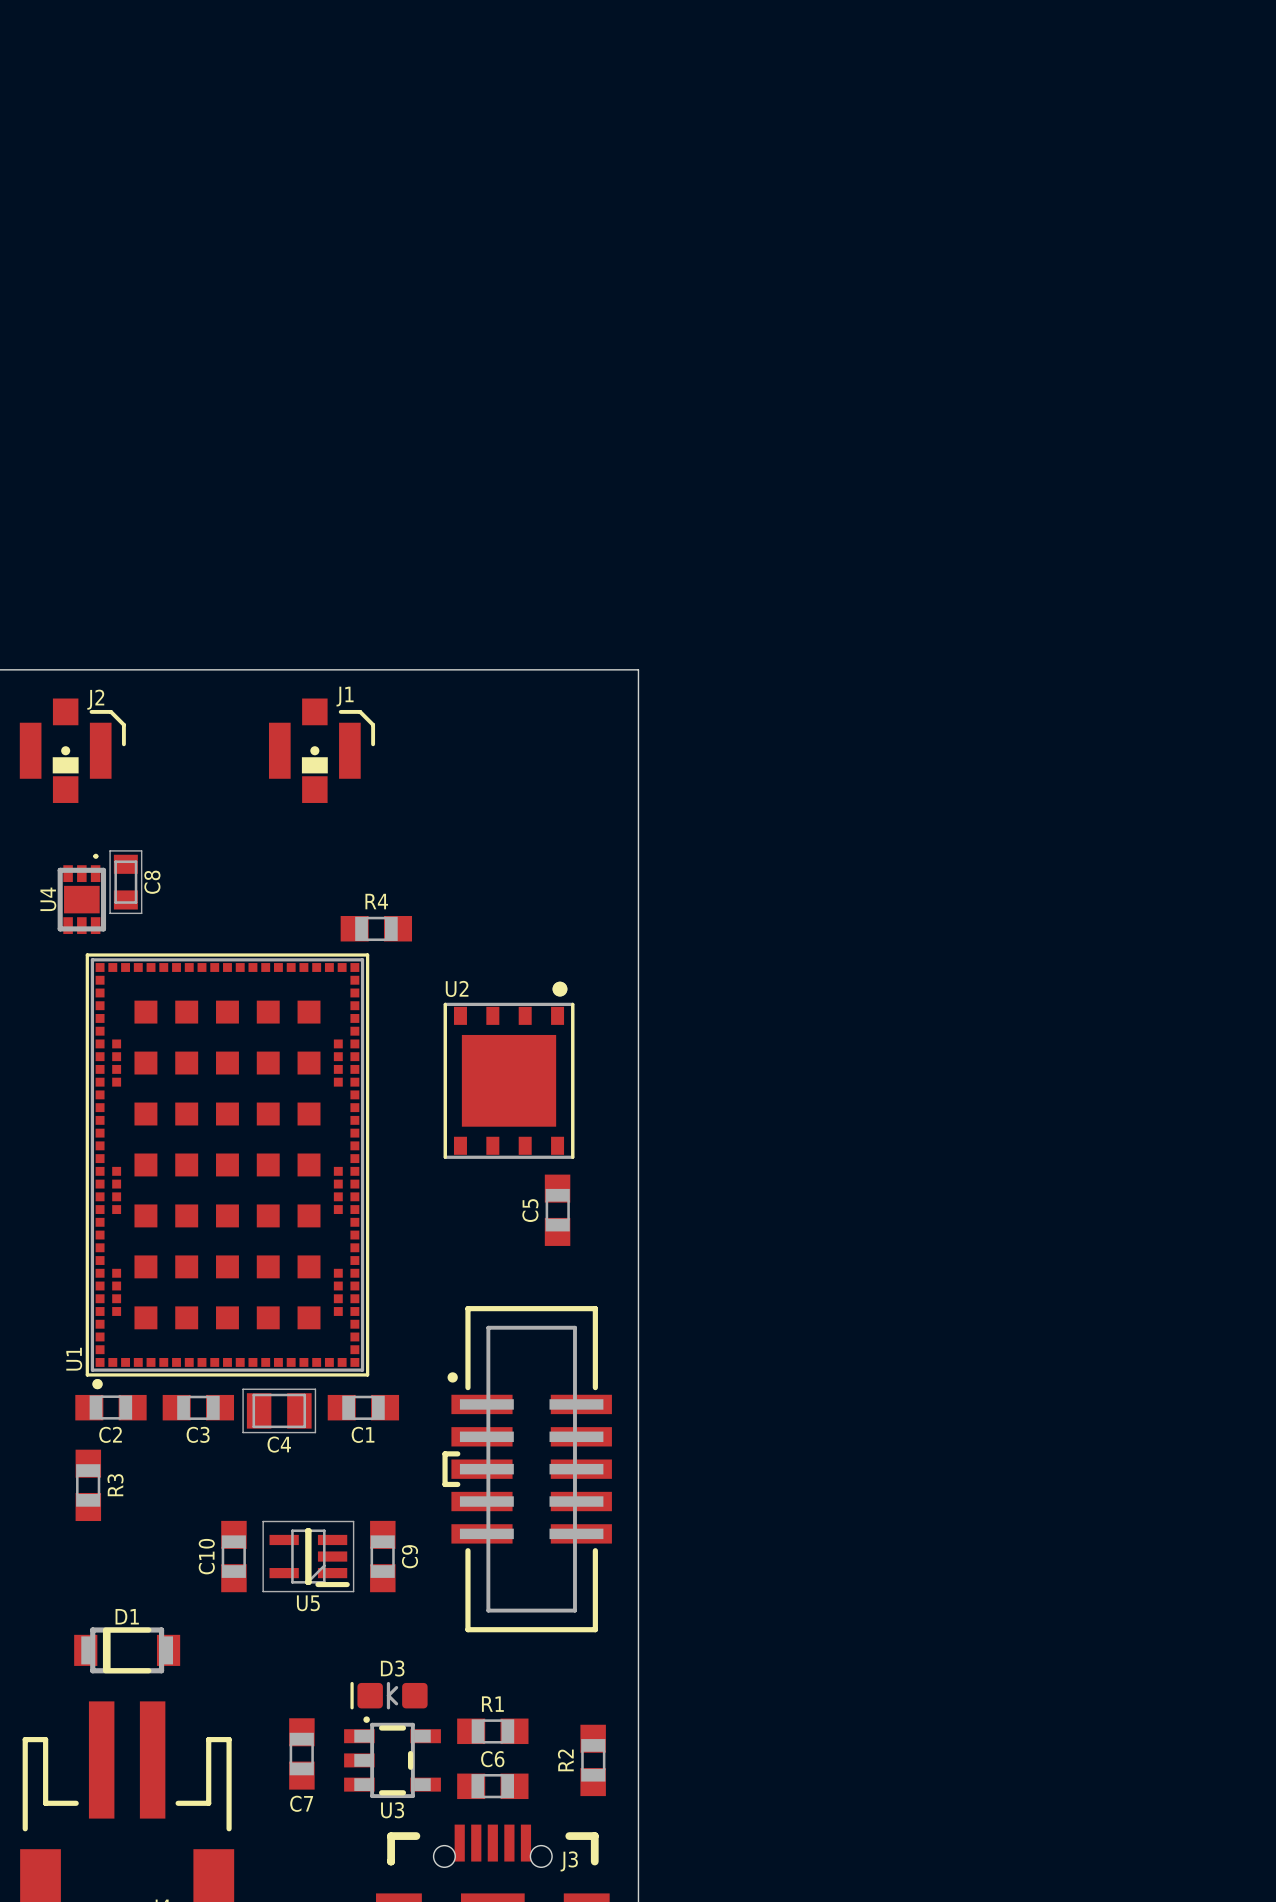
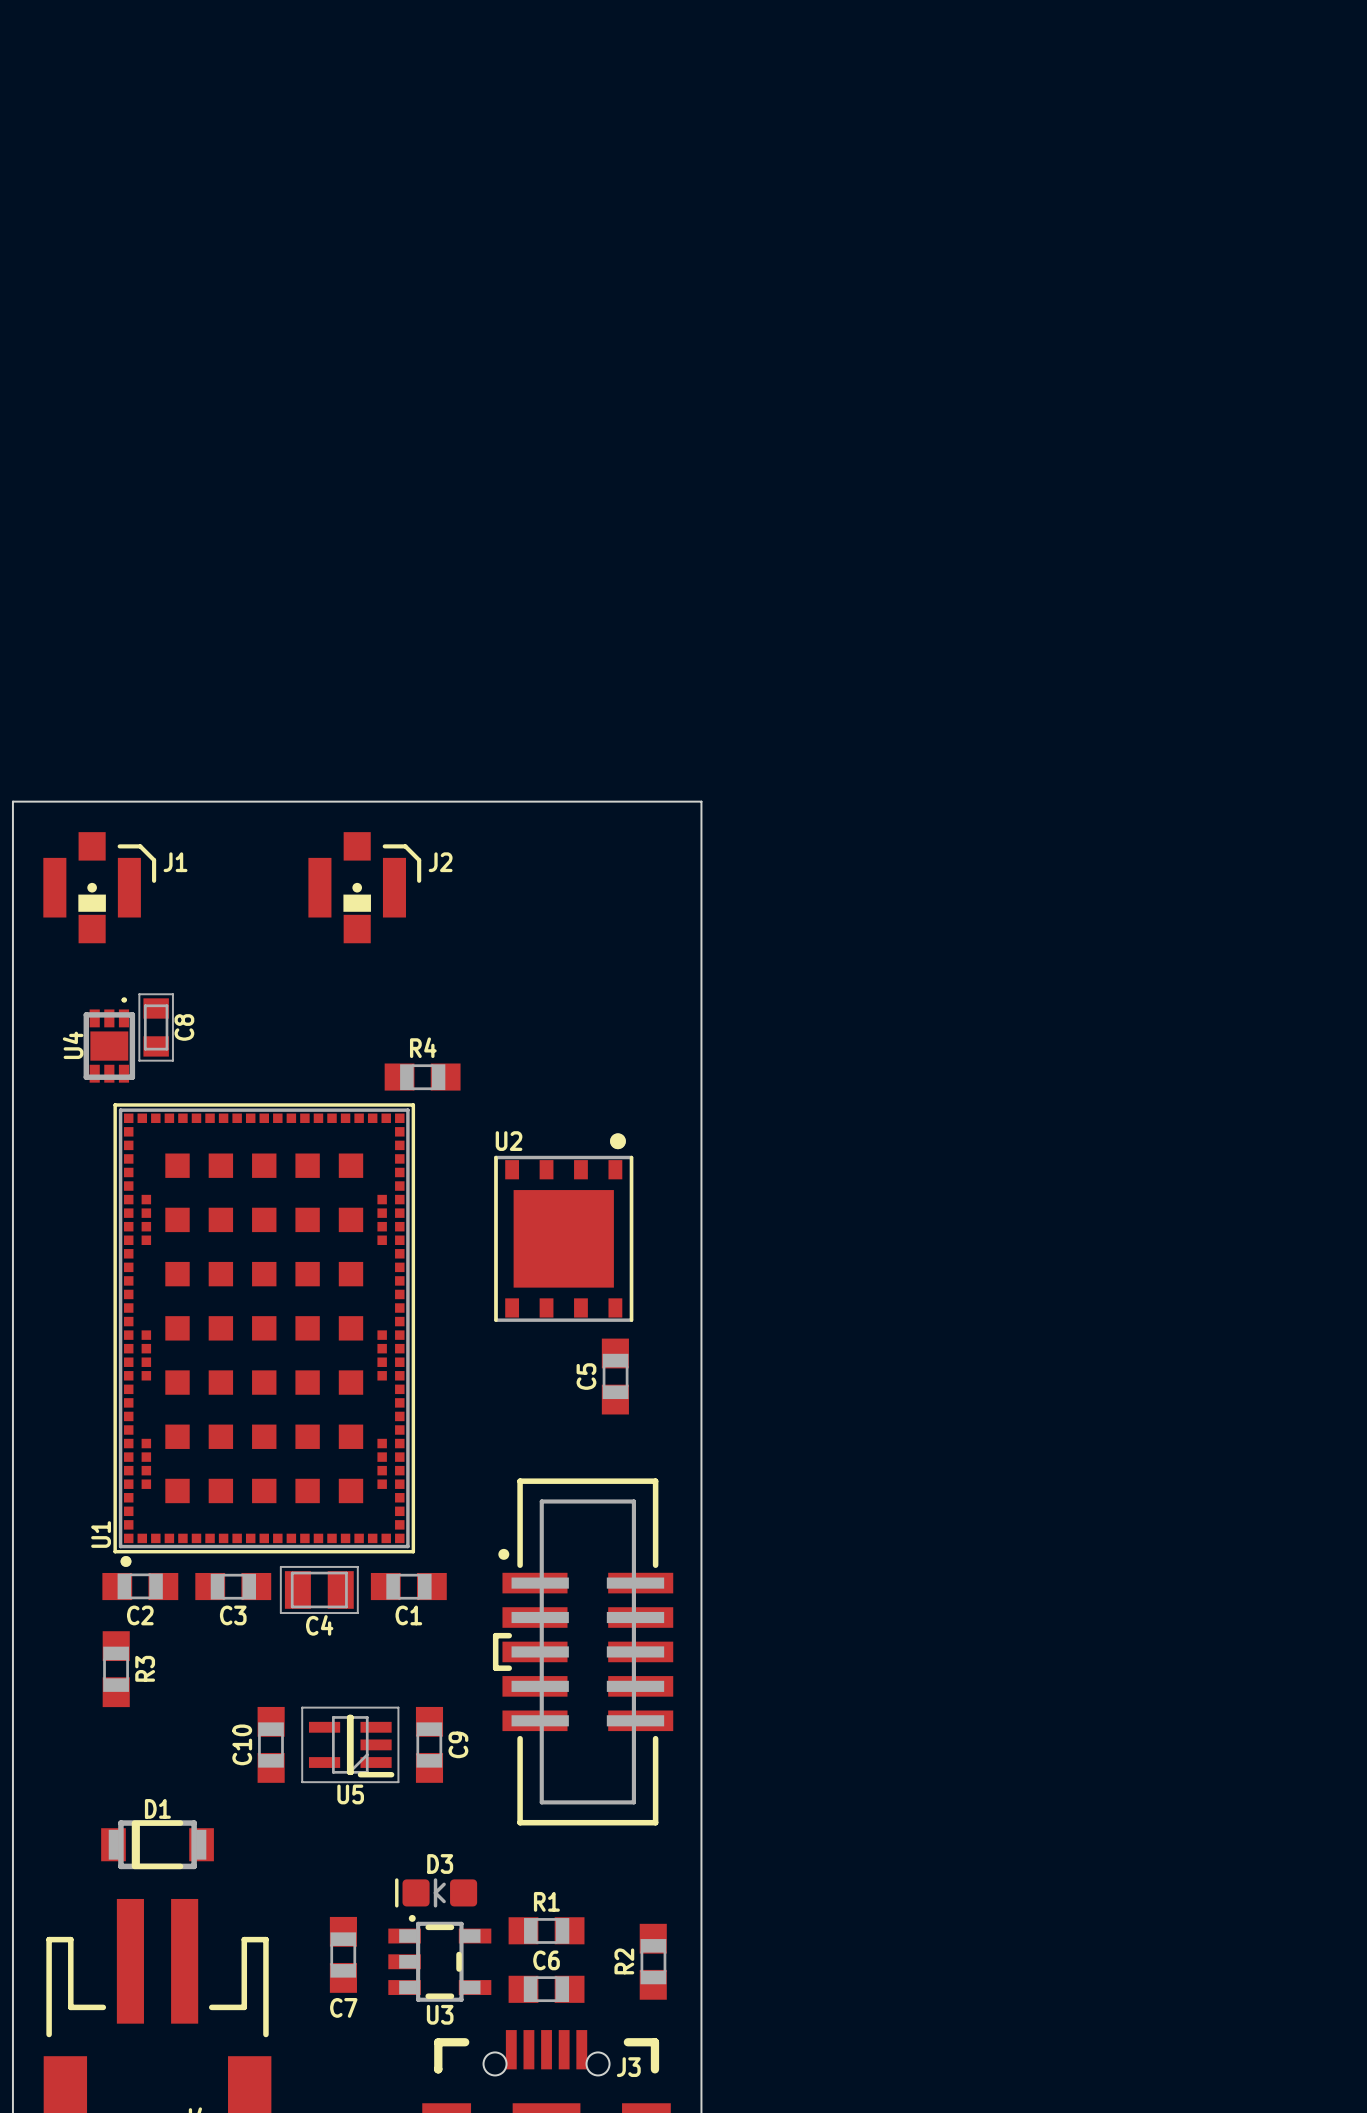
J1 name: J1 (345, 696) -> J2 (440, 862)
J2 name: J2 (95, 699) -> J1 (175, 862)

